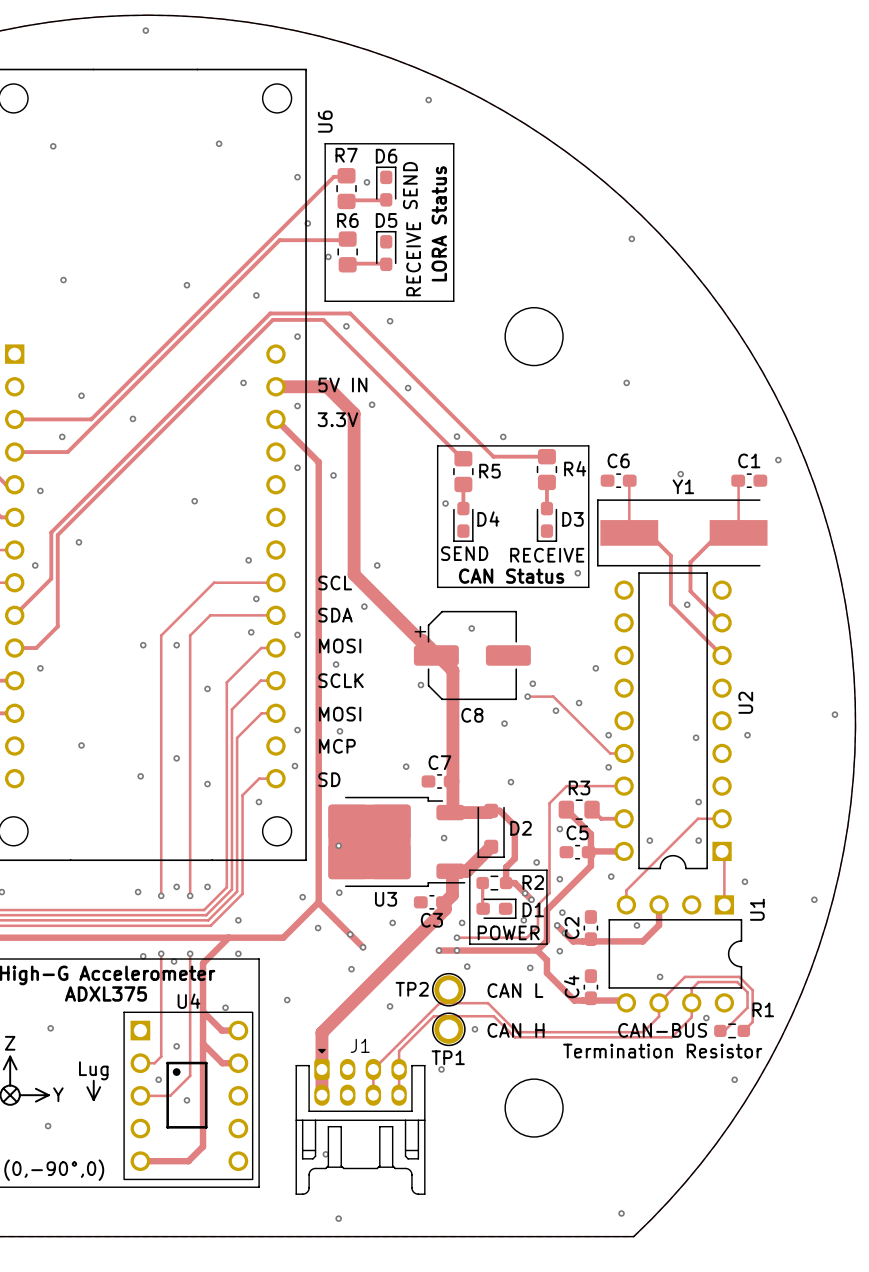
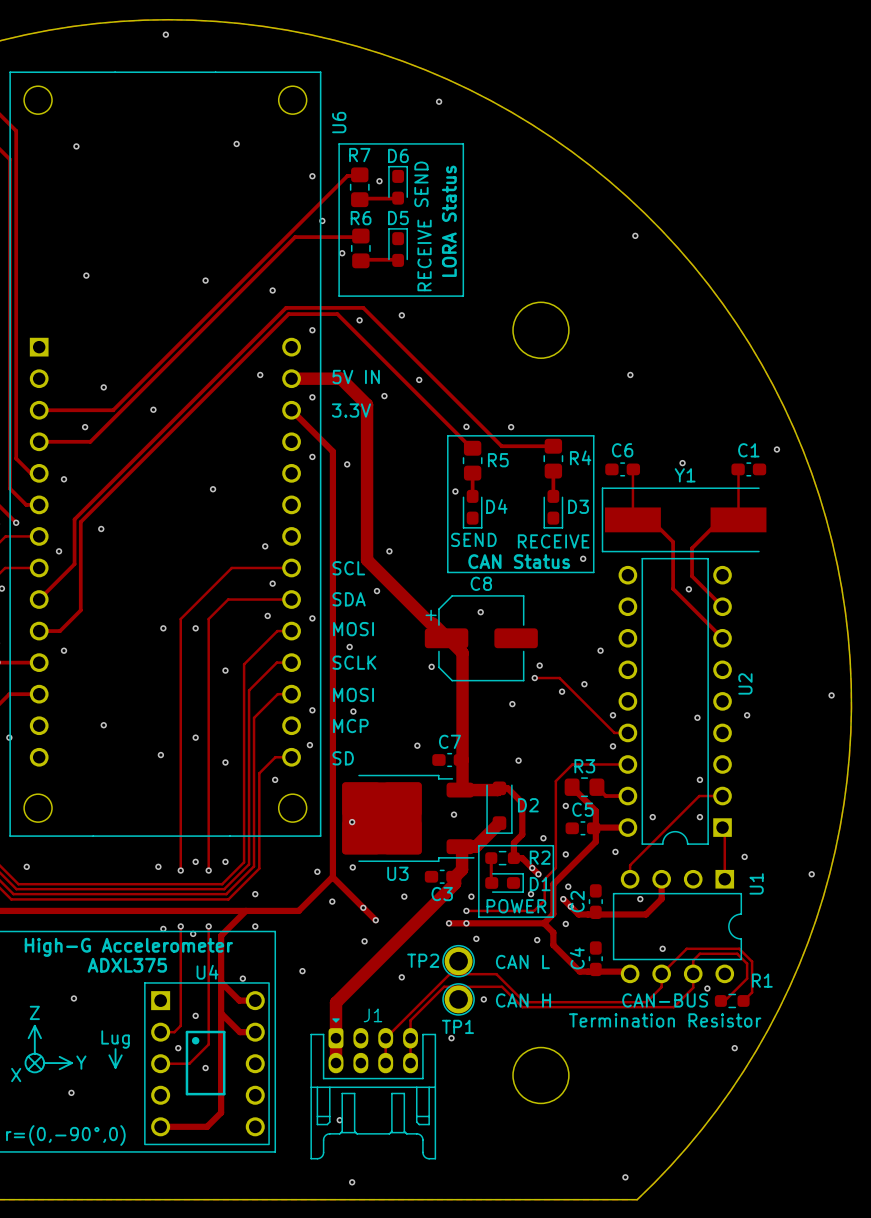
C8 name position: C8 (472, 715) -> C8 (481, 583)

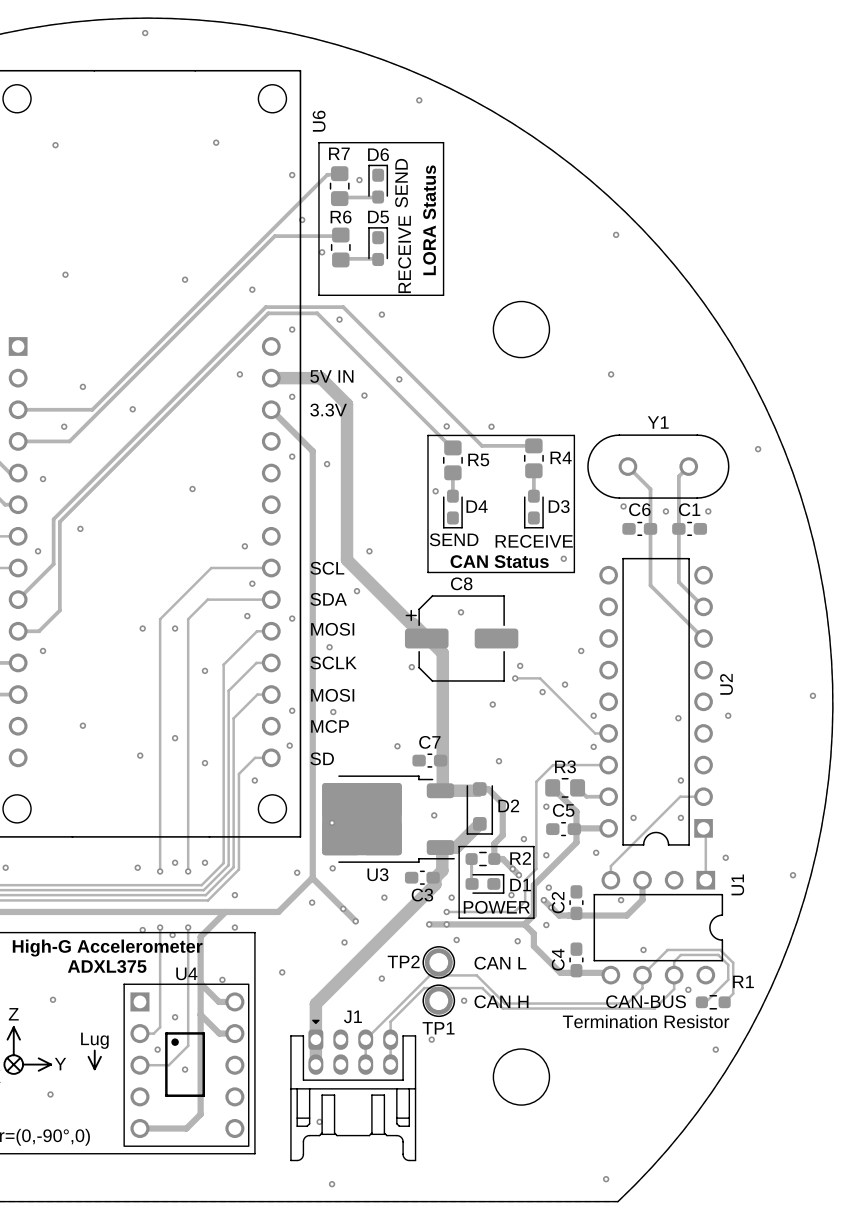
via: (682, 463) -> none
C6 position: (622, 469) -> (639, 528)
track: (633, 469) (632, 519) (651, 519) (673, 541) (673, 588) -> (627, 466) (650, 489) (650, 585) (653, 588)
track: (738, 469) (738, 519) (720, 519) (692, 548) (692, 576) (697, 582) -> (688, 466) (678, 476) (678, 582)
C1 position: (748, 469) -> (689, 528)
Y1 footprint: [601, 487, 767, 553] -> [587, 434, 730, 499]
via: none -> (623, 506)
via: none -> (665, 511)
via: none -> (708, 511)
via: (688, 589) -> none

